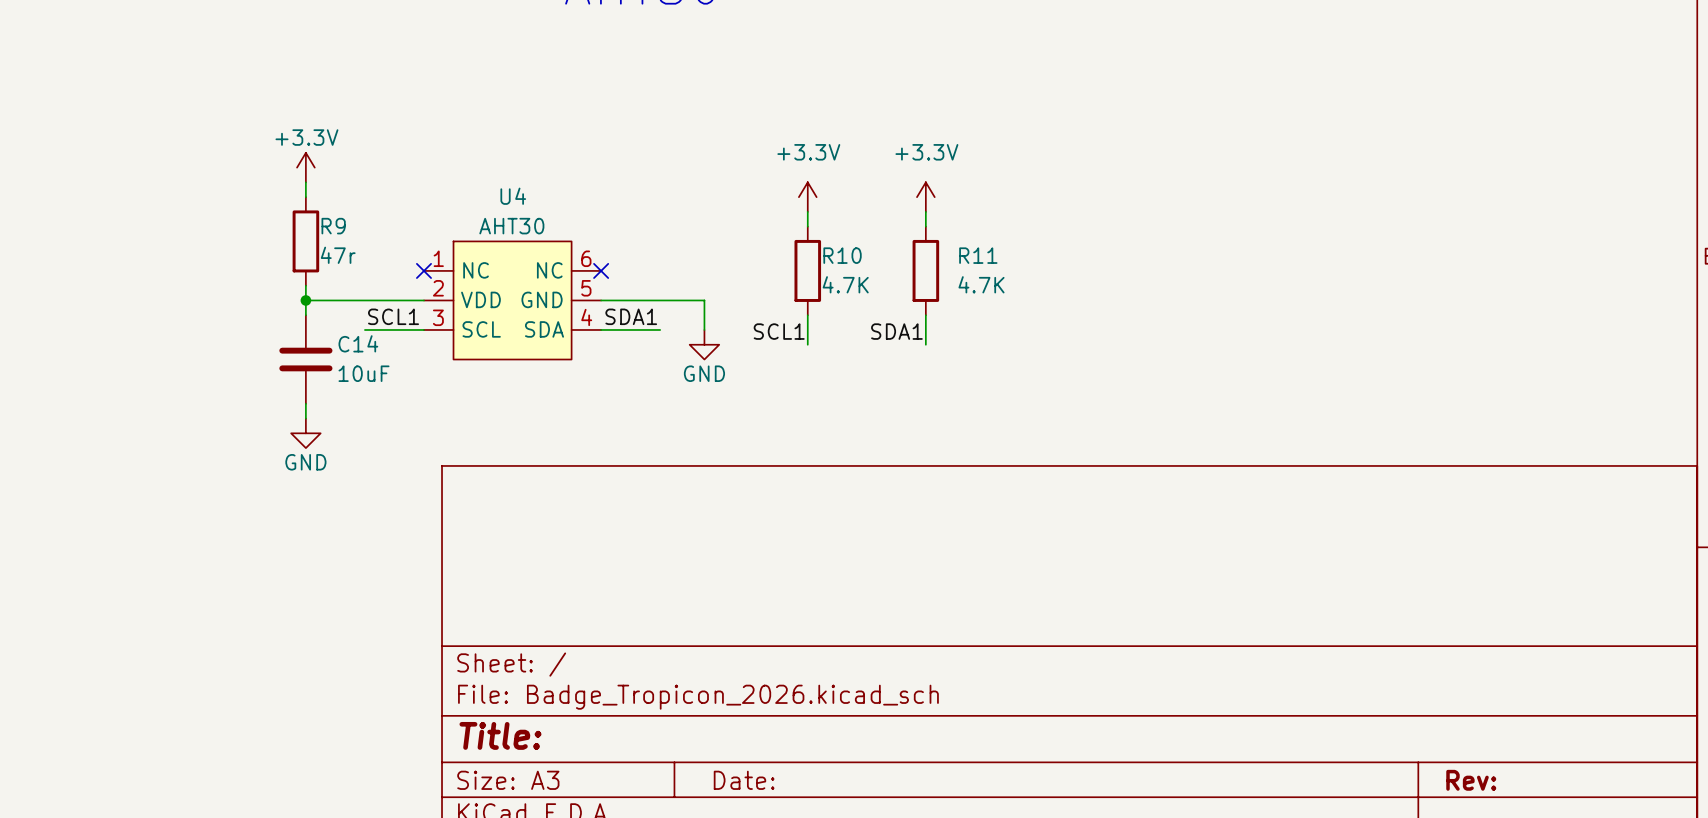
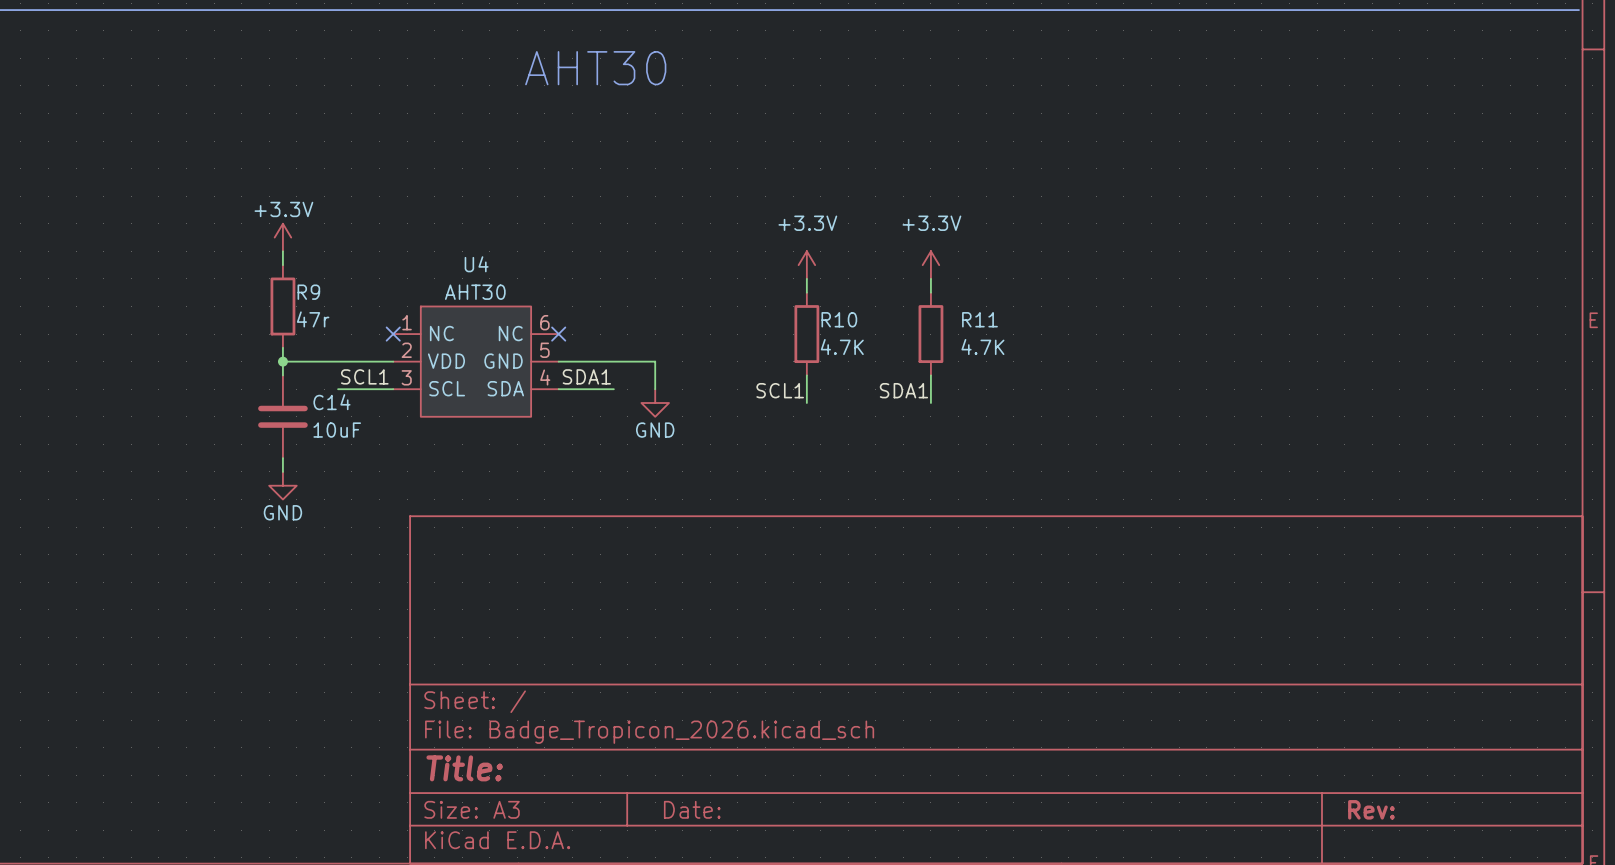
power symbol: +3.3V (807, 197) -> none
power symbol: none -> +3.3V (806, 265)
power symbol: +3.3V (925, 197) -> none
power symbol: none -> +3.3V (930, 265)
wire: (807, 211) (807, 226) -> (806, 278) (806, 292)
wire: (925, 211) (925, 226) -> (930, 278) (930, 292)
R10 position: (807, 270) -> (806, 334)
R11 position: (925, 270) -> (930, 334)
wire: (807, 315) (807, 344) -> (806, 375) (806, 403)
wire: (925, 315) (925, 344) -> (930, 375) (930, 403)
label position: SCL1 (779, 331) -> SCL1 (780, 390)
label position: SDA1 (896, 331) -> SDA1 (903, 390)

